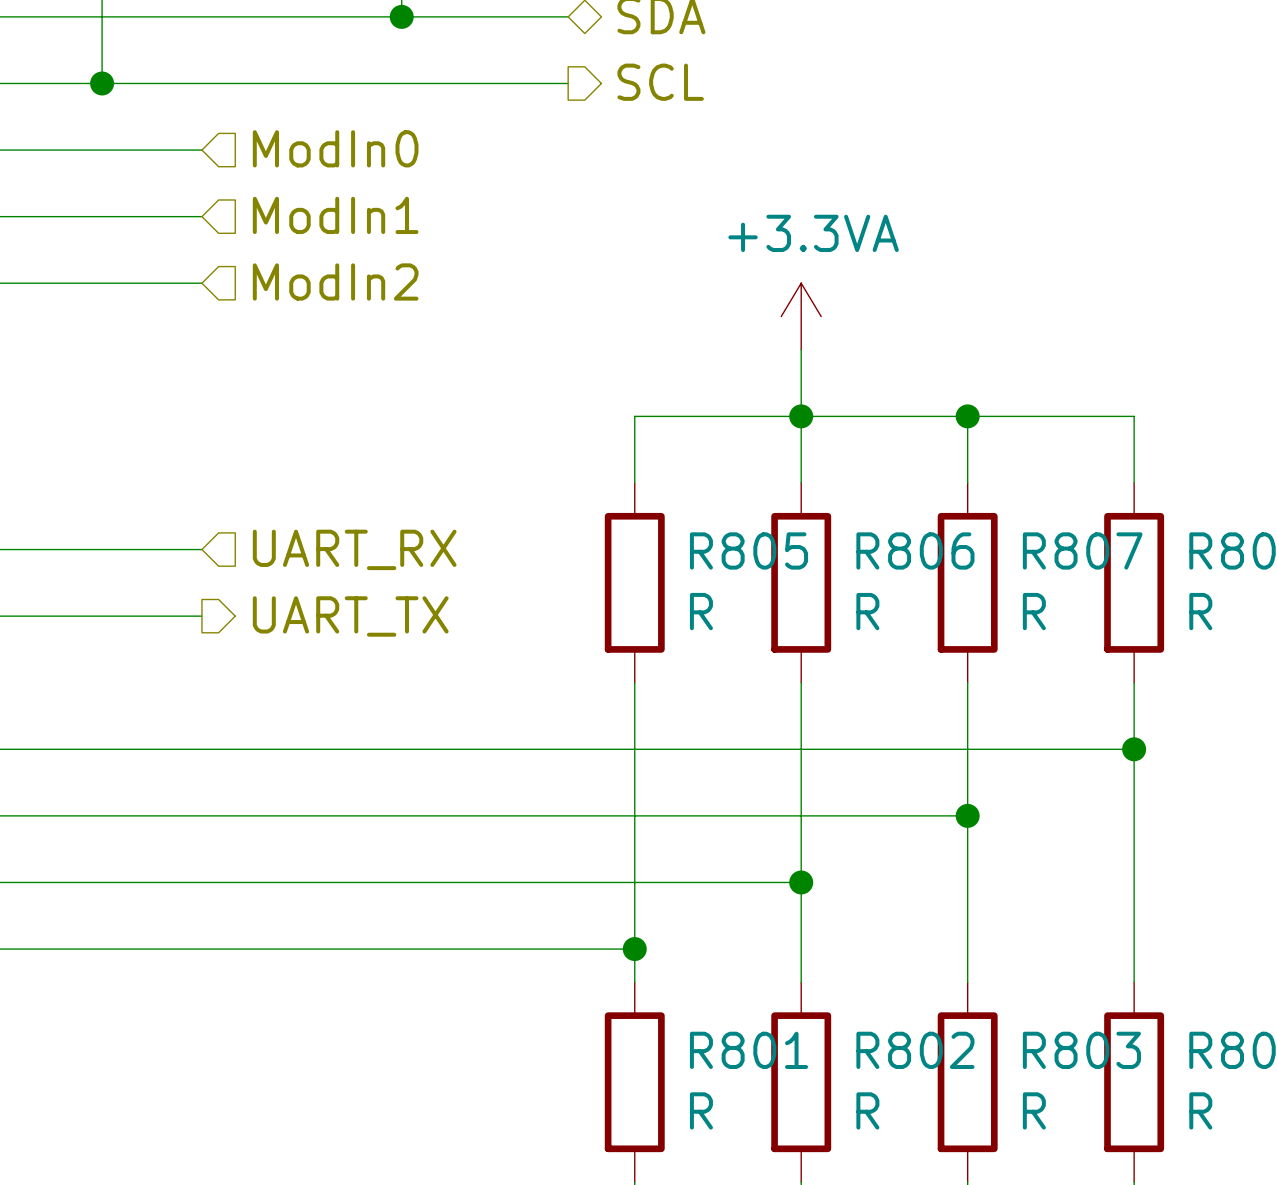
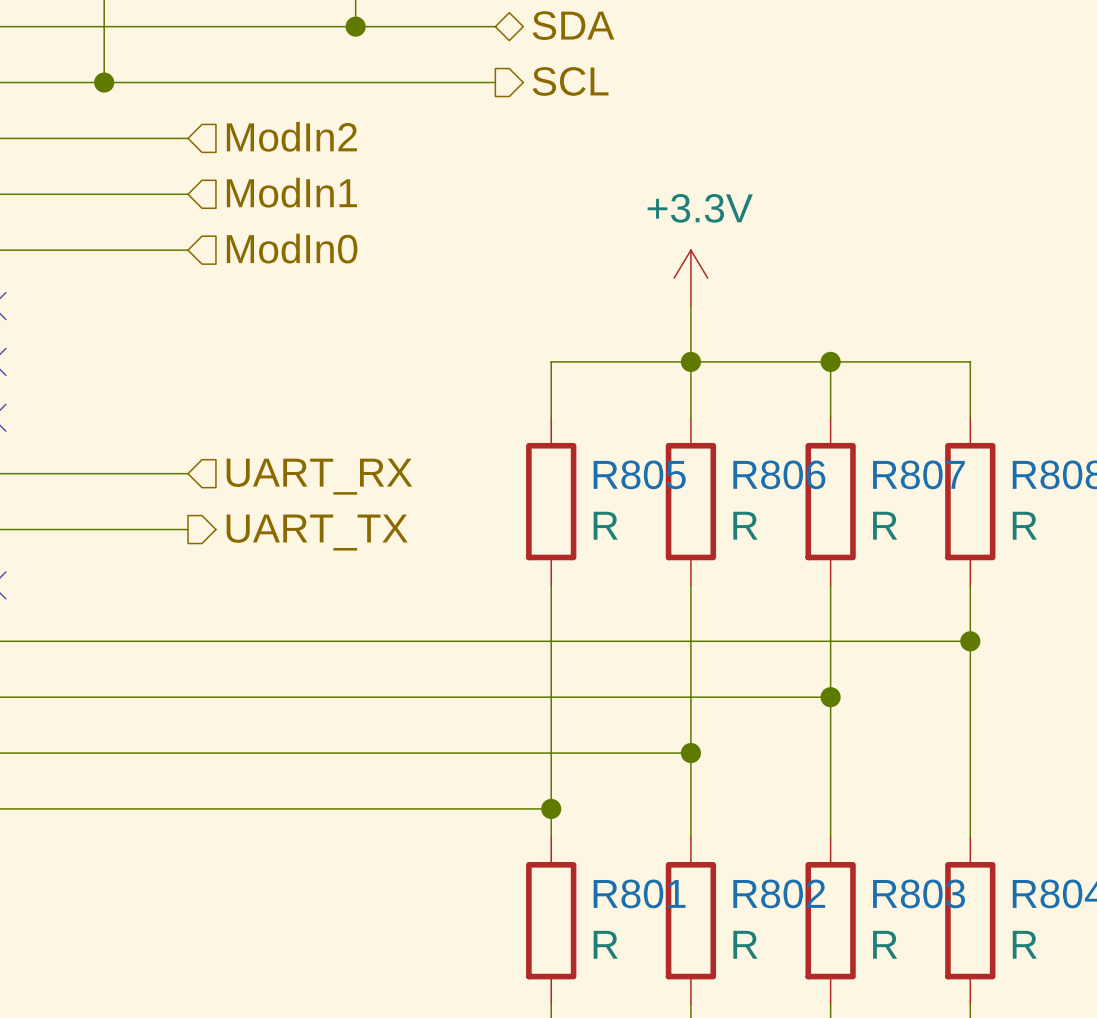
hierarchical label: ModIn0 (335, 148) -> ModIn2 (291, 136)
hierarchical label: ModIn2 (335, 281) -> ModIn0 (292, 248)
power symbol: +3.3VA (801, 316) -> +3.3V (690, 278)

